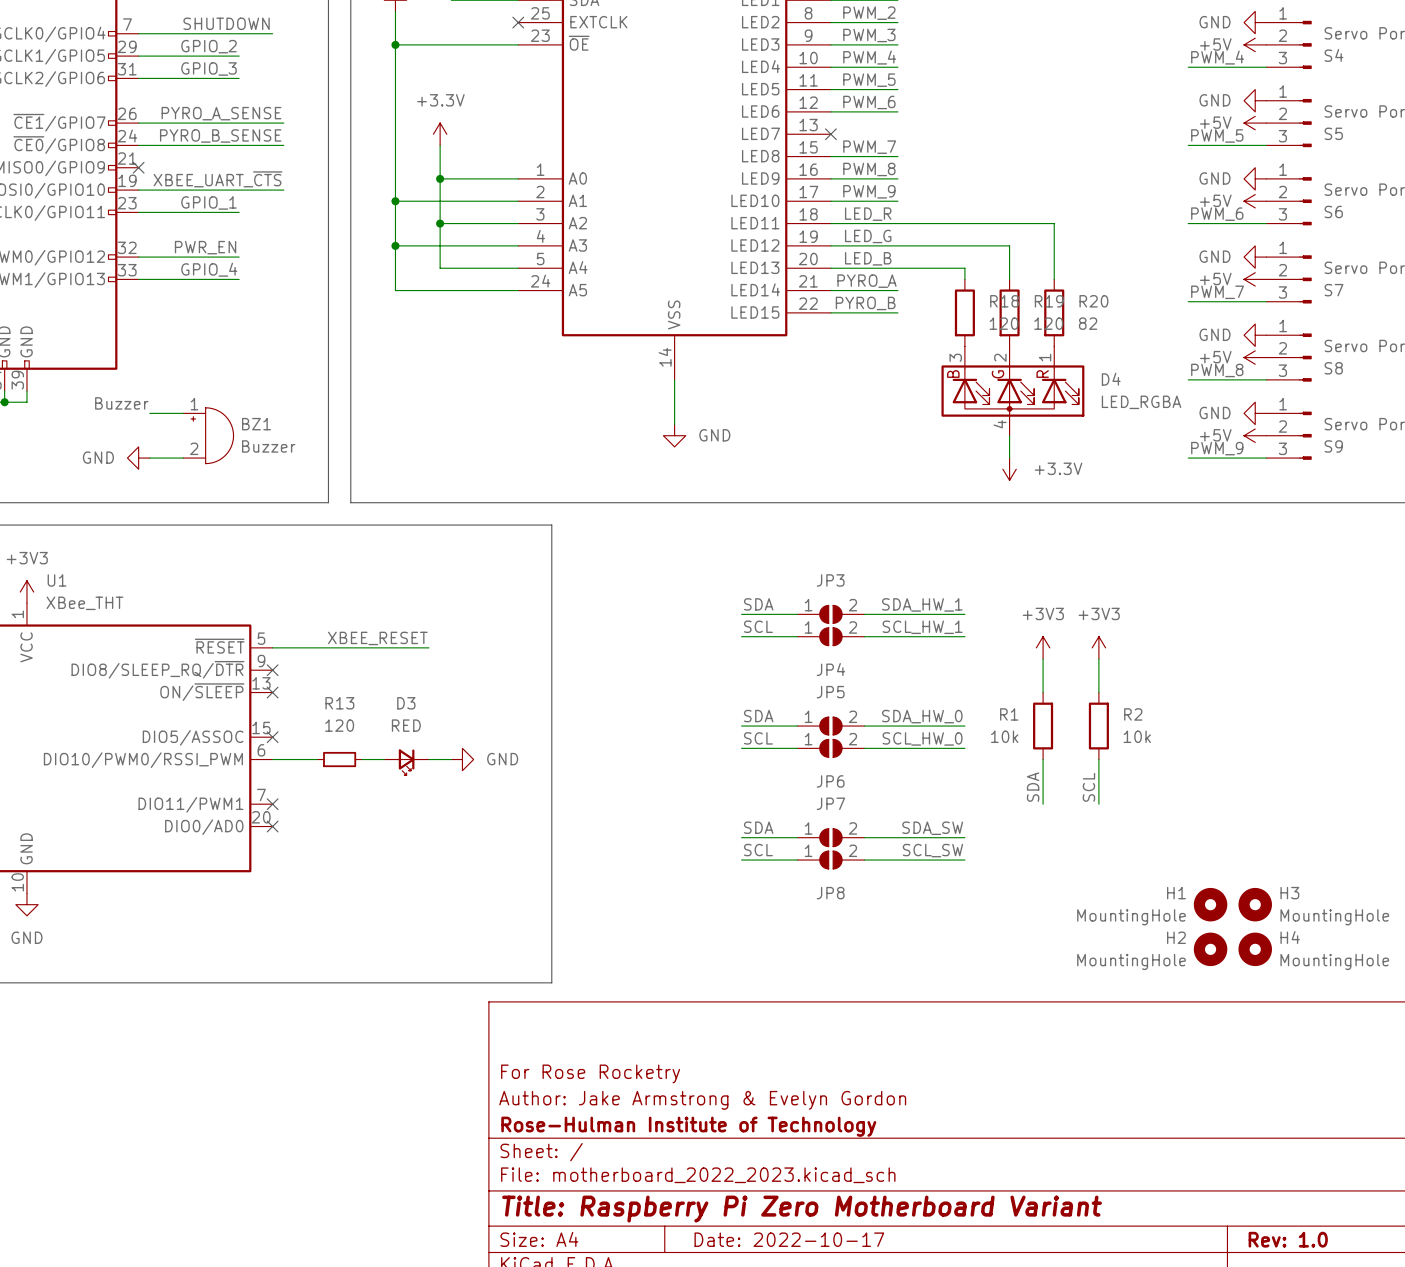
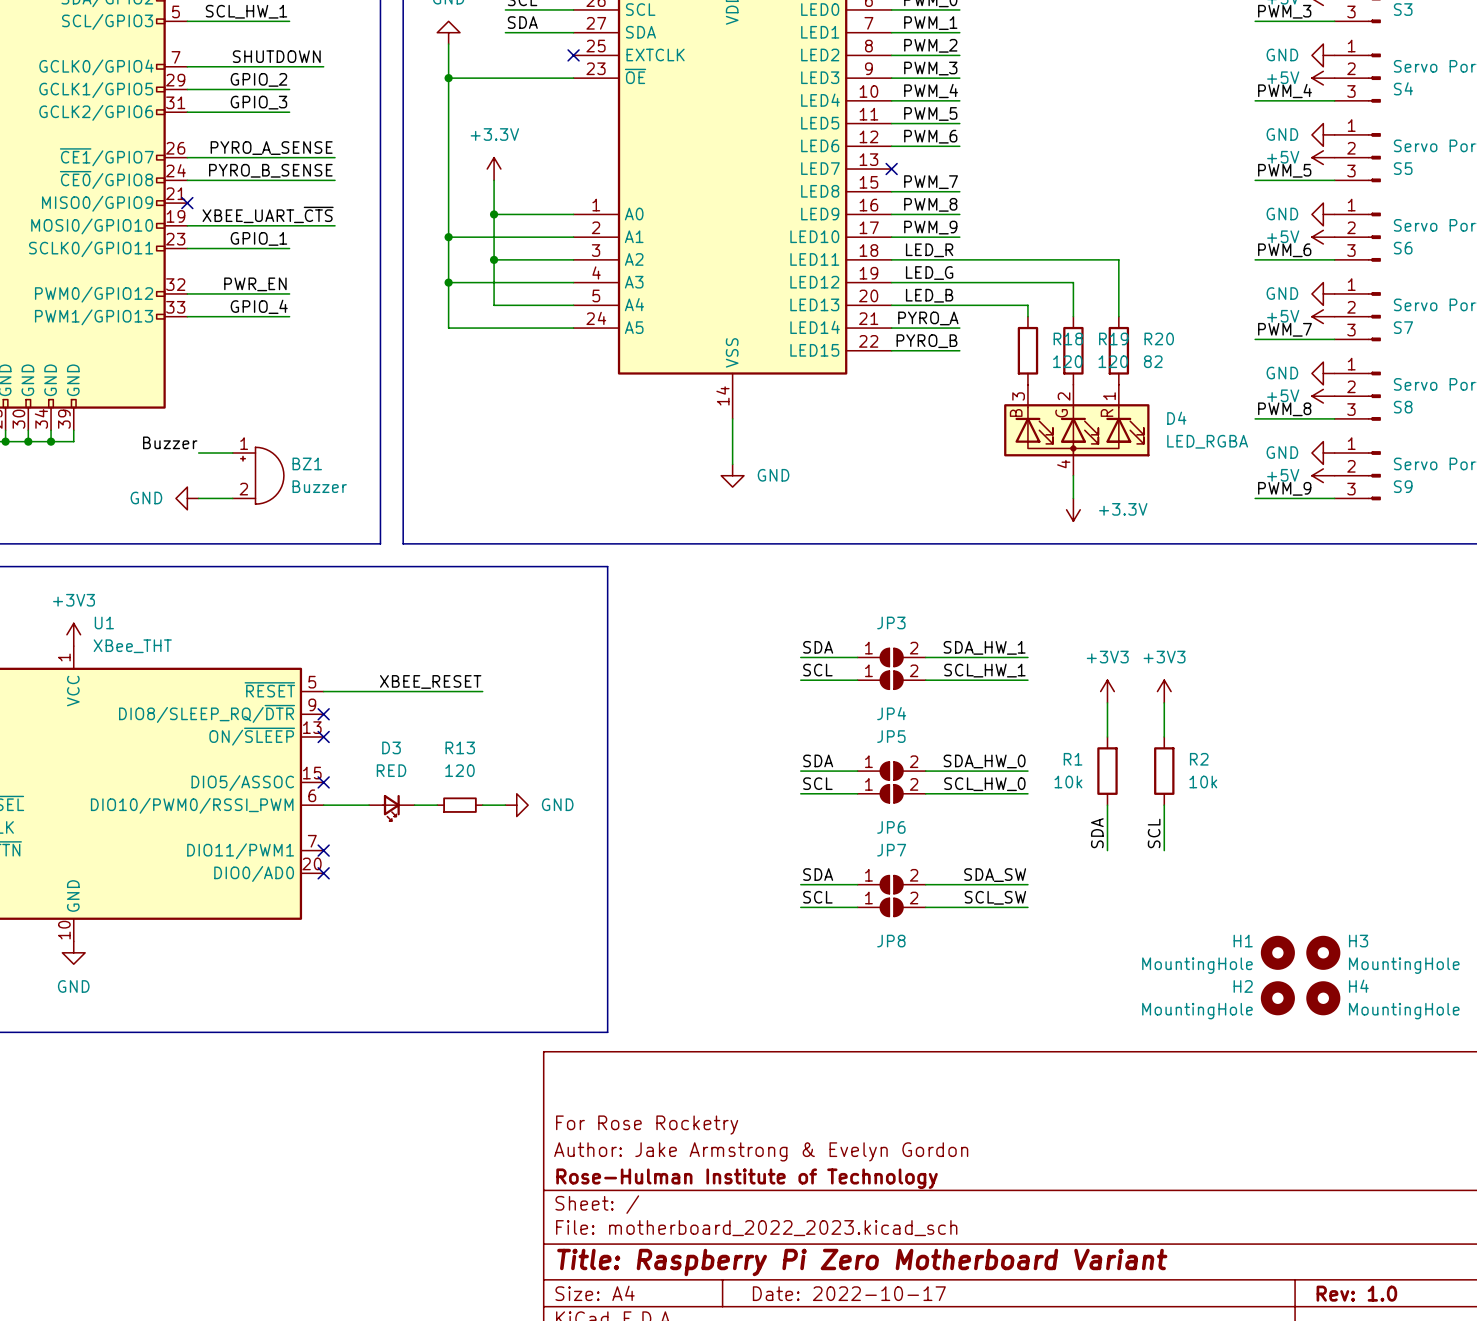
R13 position: (339, 759) -> (459, 805)
D3 position: (406, 762) -> (391, 807)

